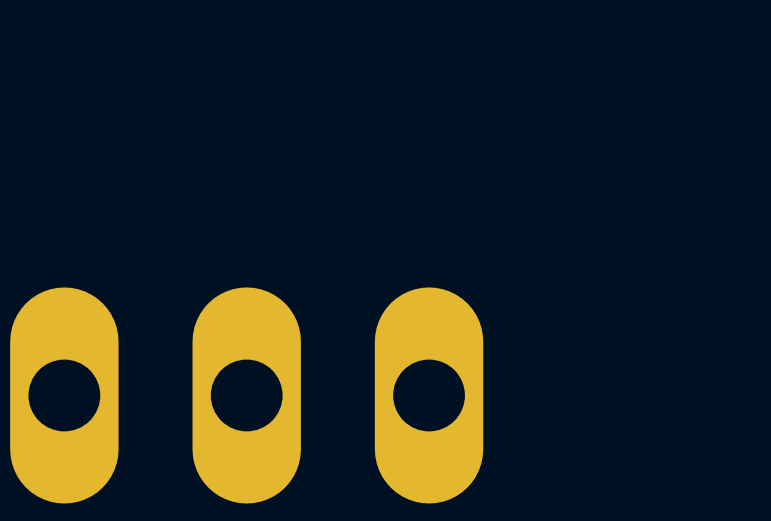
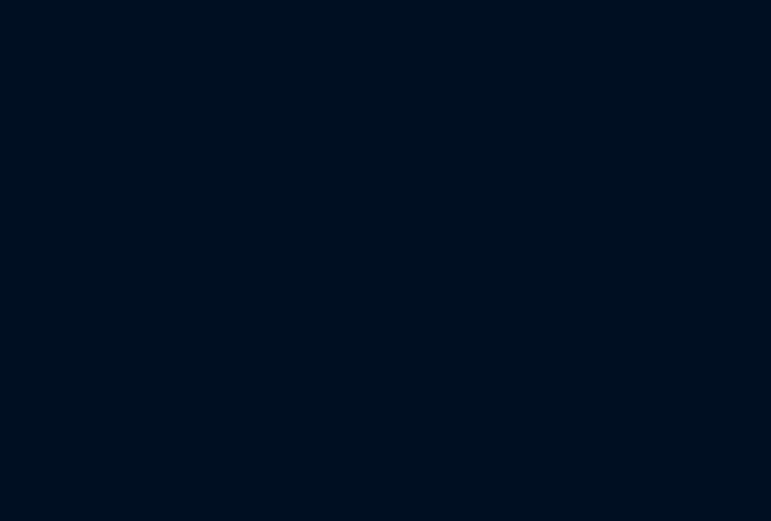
part: (246, 395) -> none

